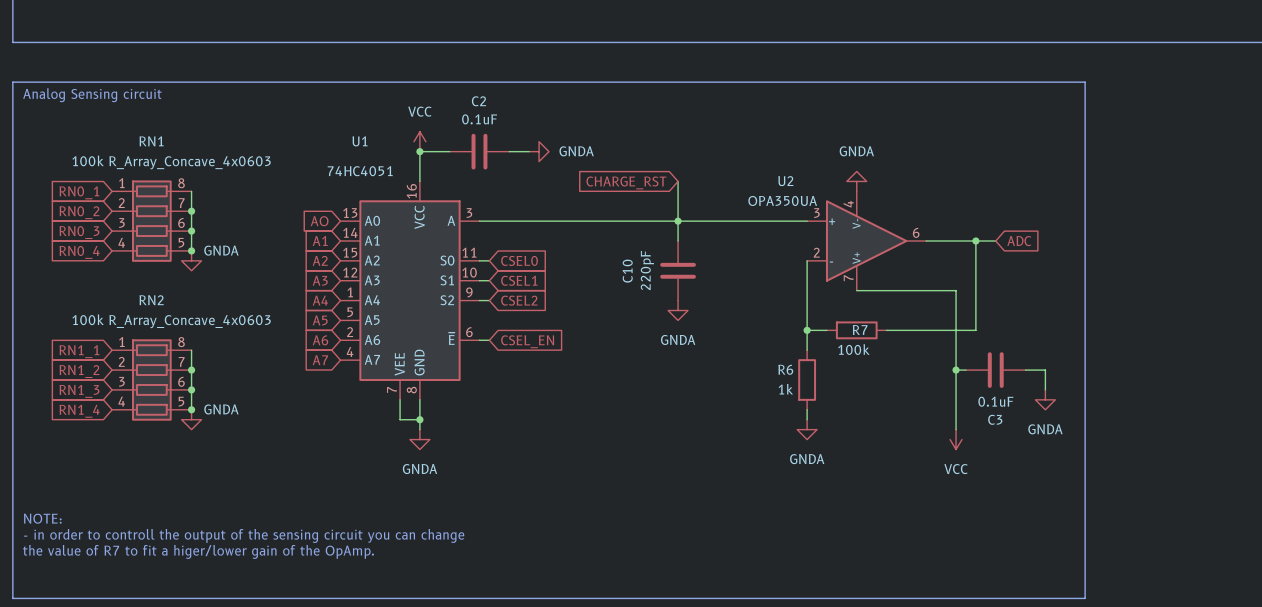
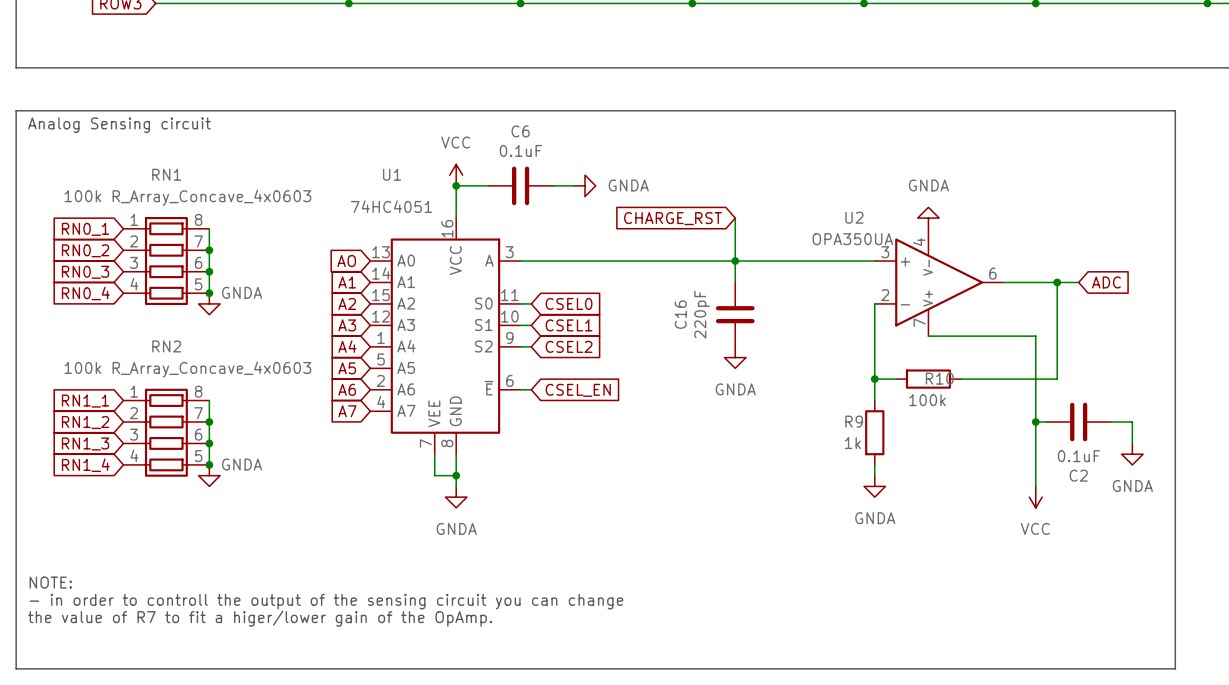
C2 name: C2 (478, 101) -> C6 (520, 131)
C10 name: C10 (627, 271) -> C16 (680, 314)
R7 name: R7 (860, 330) -> R10 (939, 378)
R6 name: R6 (785, 369) -> R9 (854, 421)
C3 name: C3 (995, 419) -> C2 (1078, 475)

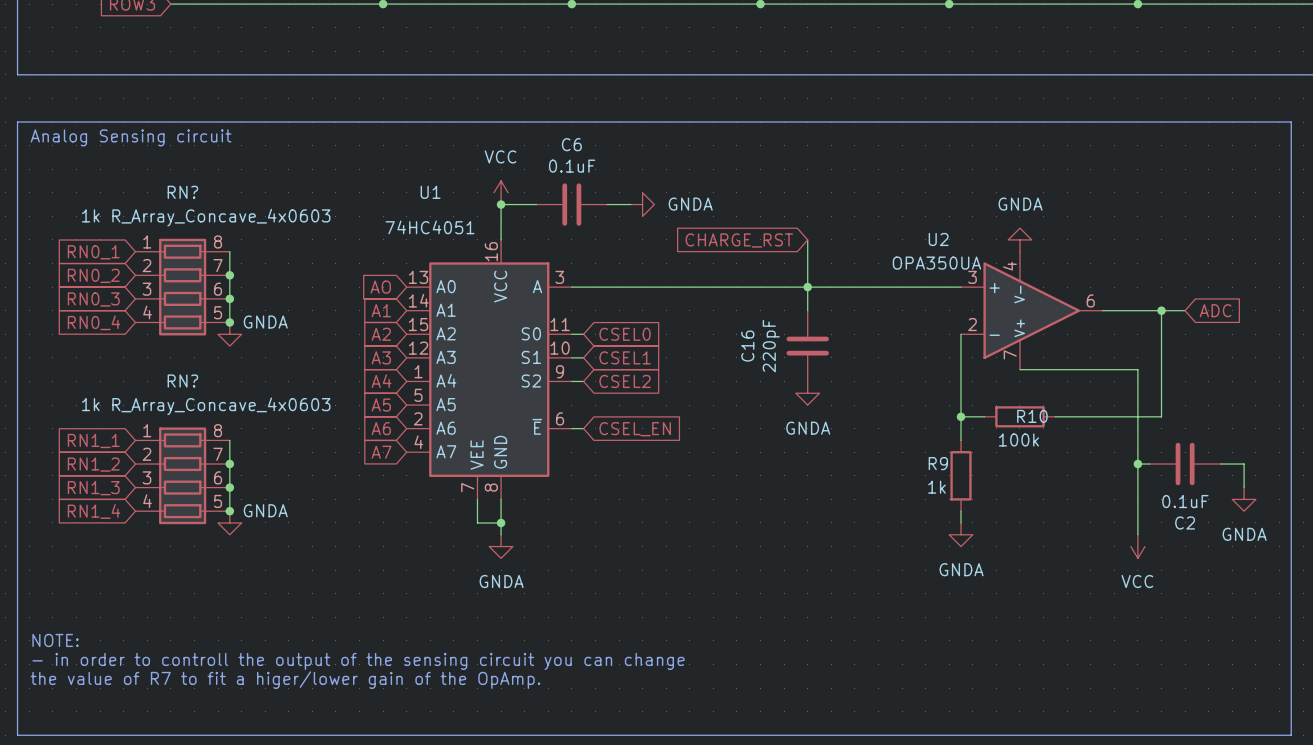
RN1 name: RN1 (166, 174) -> RN? (182, 192)
RN1 value: 100k R_Array_Concave_4x0603 (187, 197) -> 1k R_Array_Concave_4x0603 (206, 217)
RN2 name: RN2 (166, 346) -> RN? (182, 381)
RN2 value: 100k R_Array_Concave_4x0603 (187, 369) -> 1k R_Array_Concave_4x0603 (206, 406)

